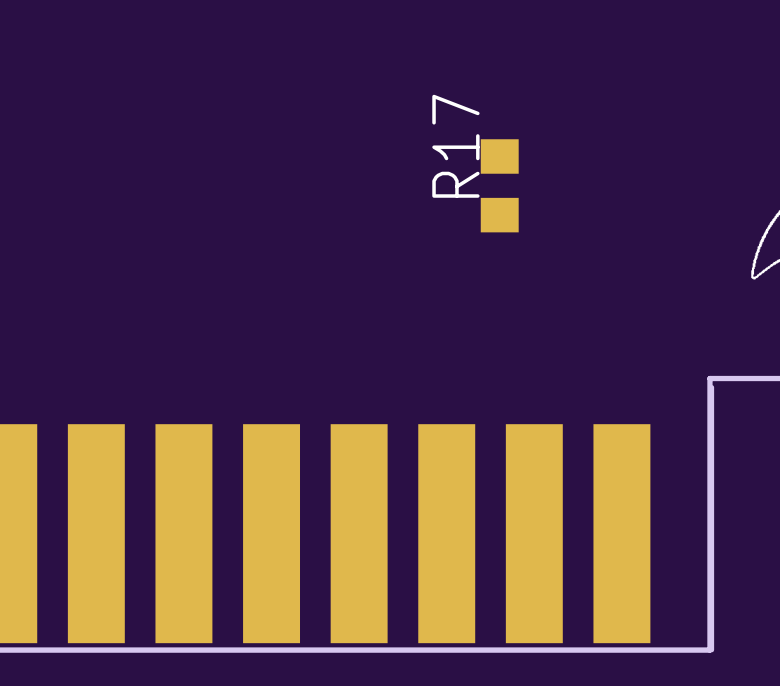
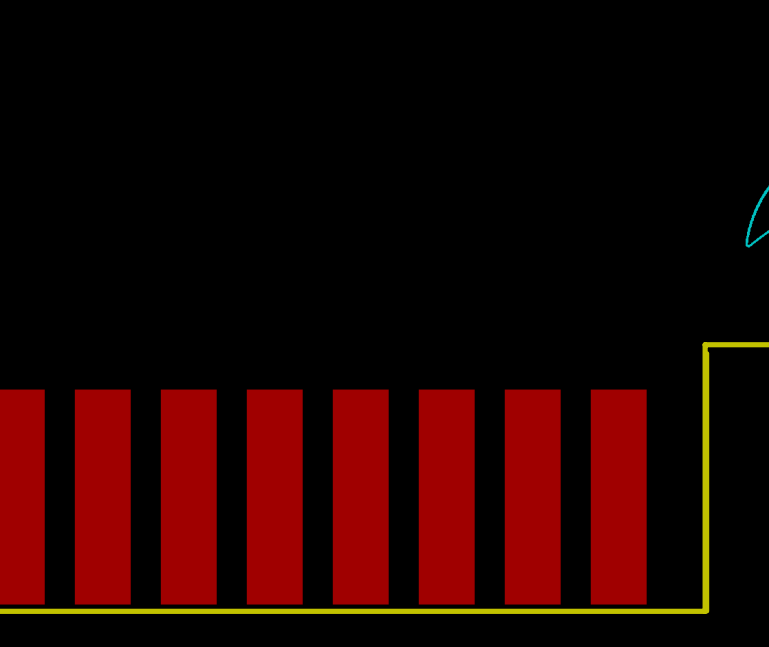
R17: (499, 185) -> none

